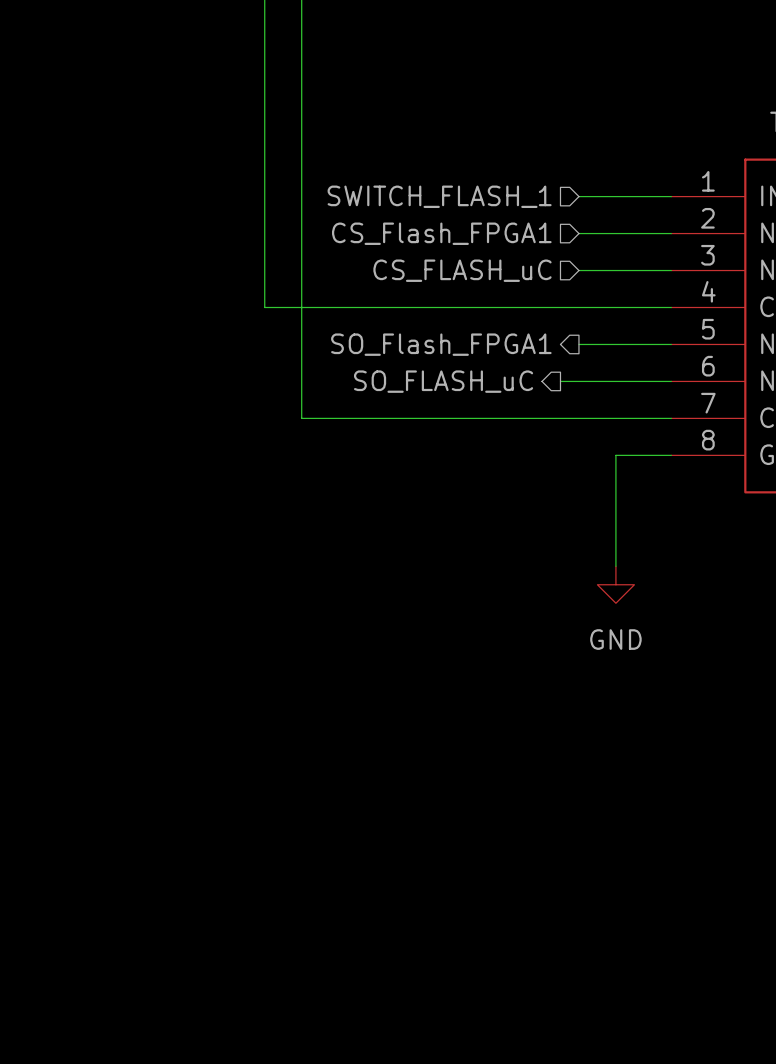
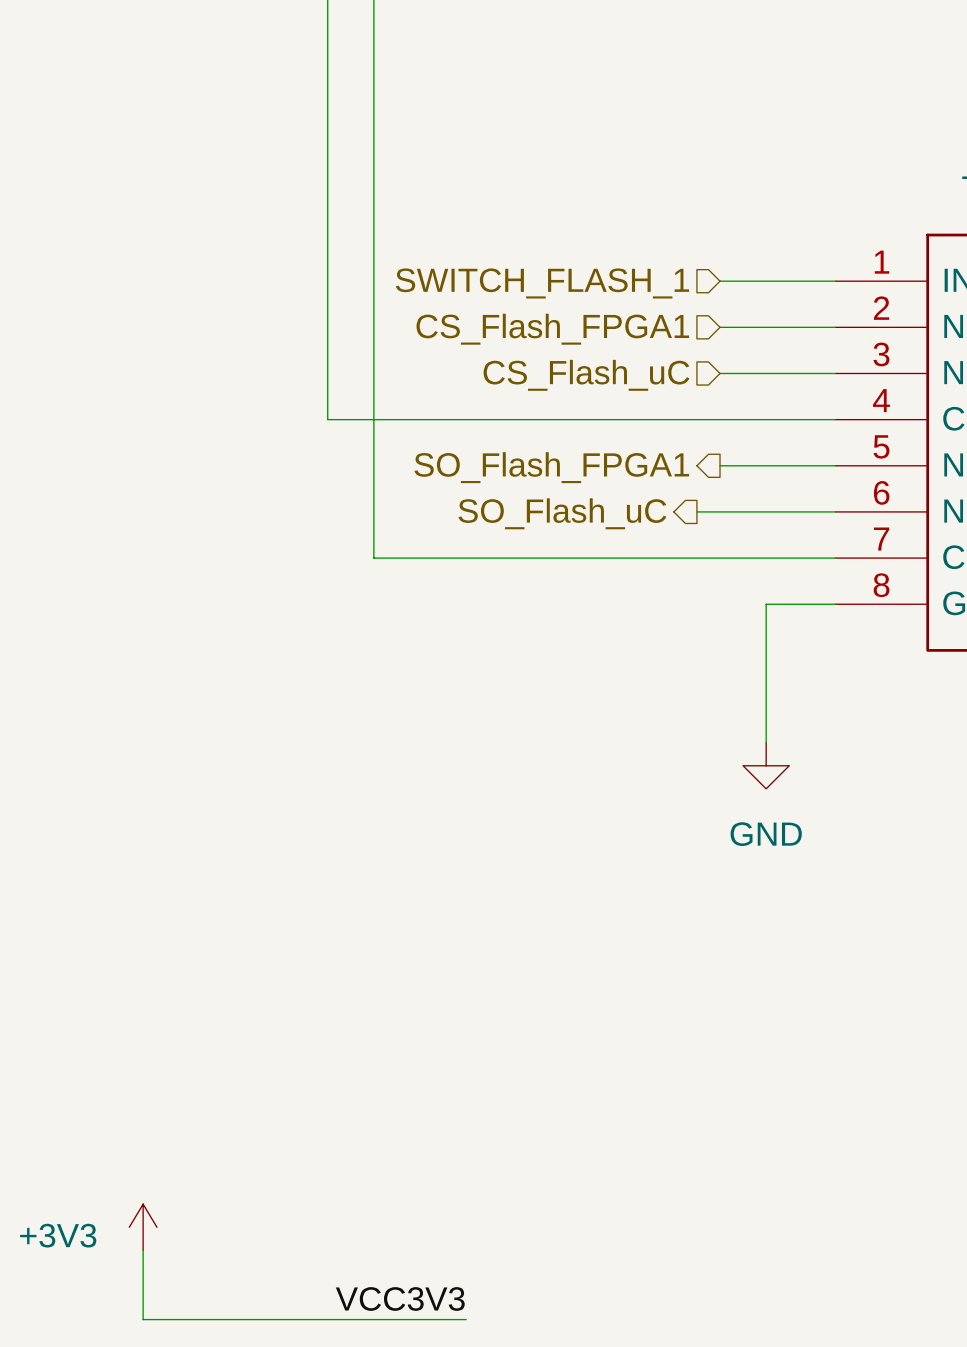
hierarchical label: CS_FLASH_uC (462, 270) -> CS_Flash_uC (586, 375)
hierarchical label: SO_FLASH_uC (443, 381) -> SO_Flash_uC (562, 513)
power symbol: none -> +3V3 (143, 1227)
wire: none -> (143, 1250) (143, 1319) (466, 1319)
label: none -> VCC3V3 (400, 1298)

